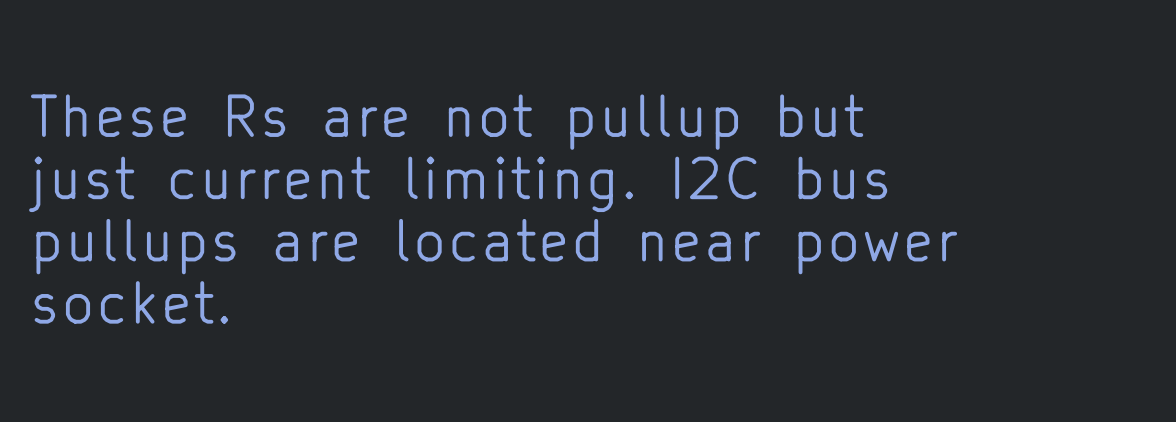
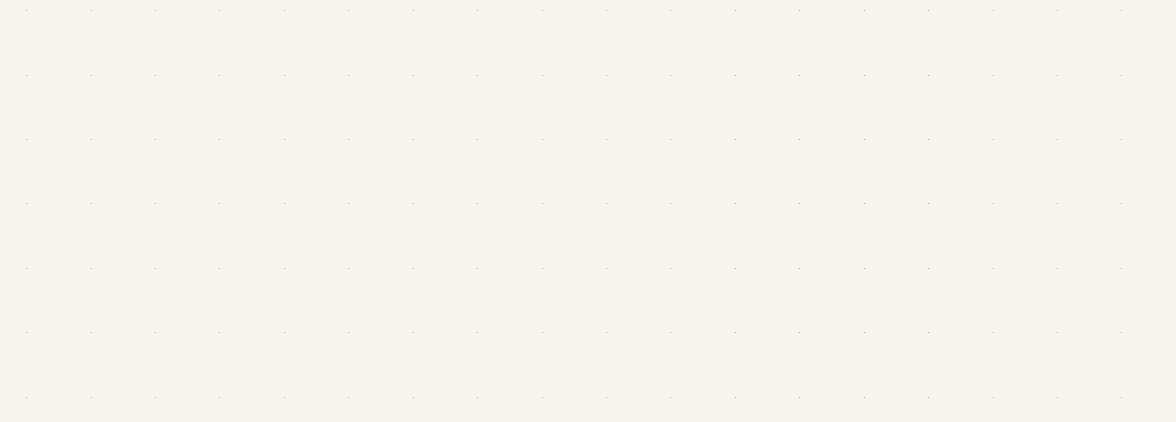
text: These Rs are not pullup but (447, 122) -> none
text: just current limiting. I2C bus (458, 184) -> none
text: pullups are located near power (496, 246) -> none
text: socket. (131, 302) -> none

